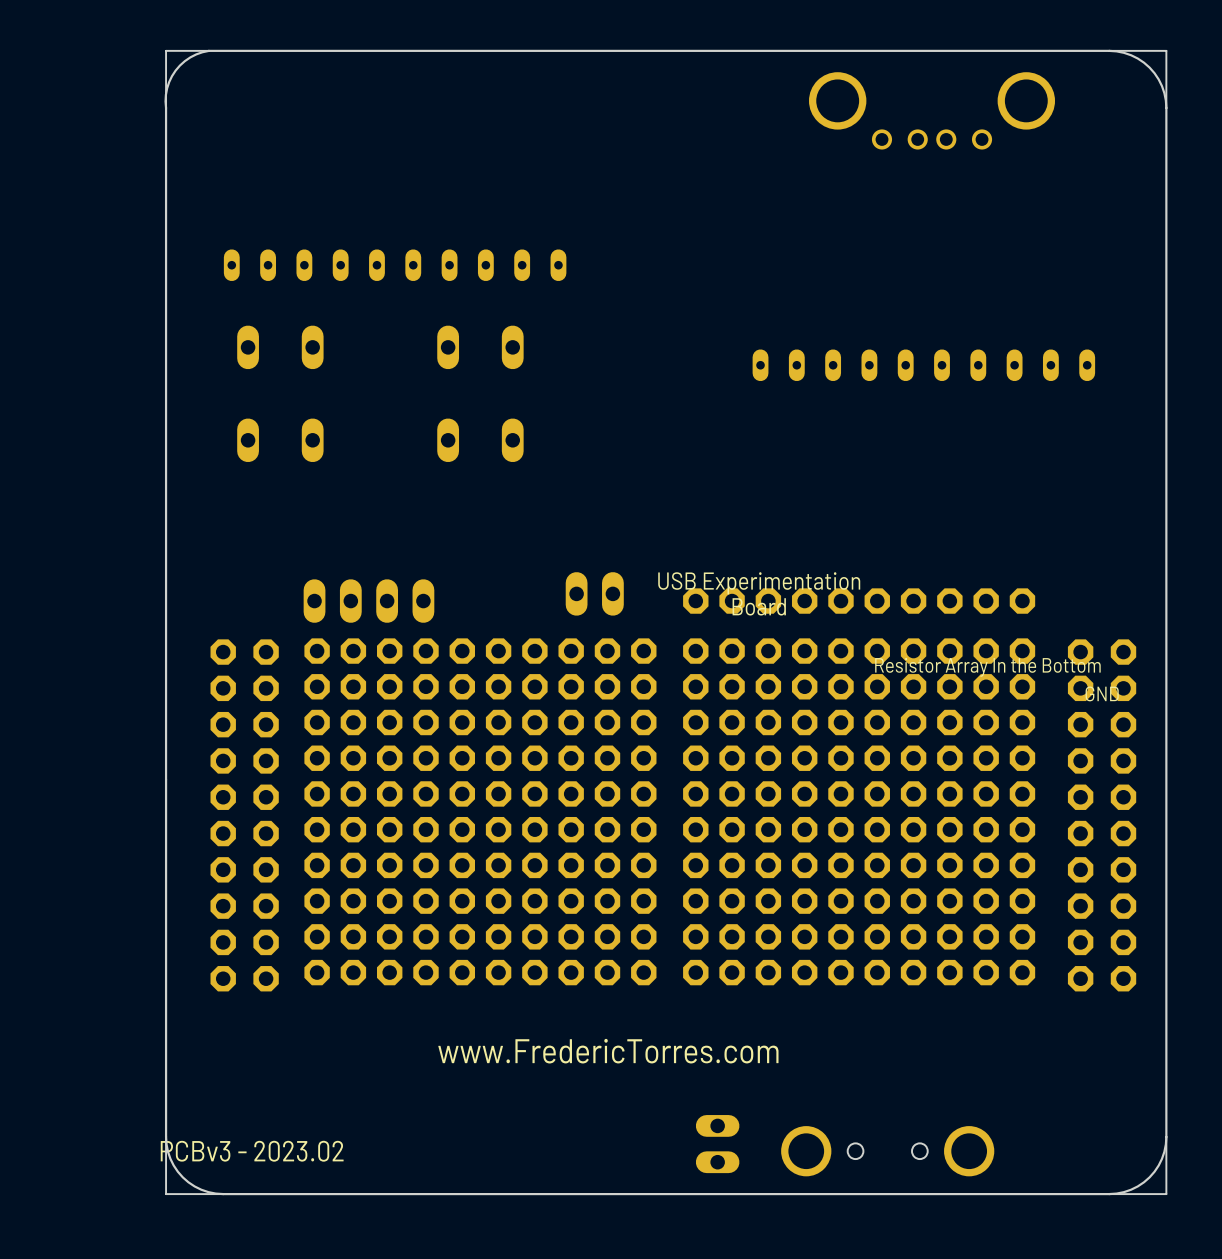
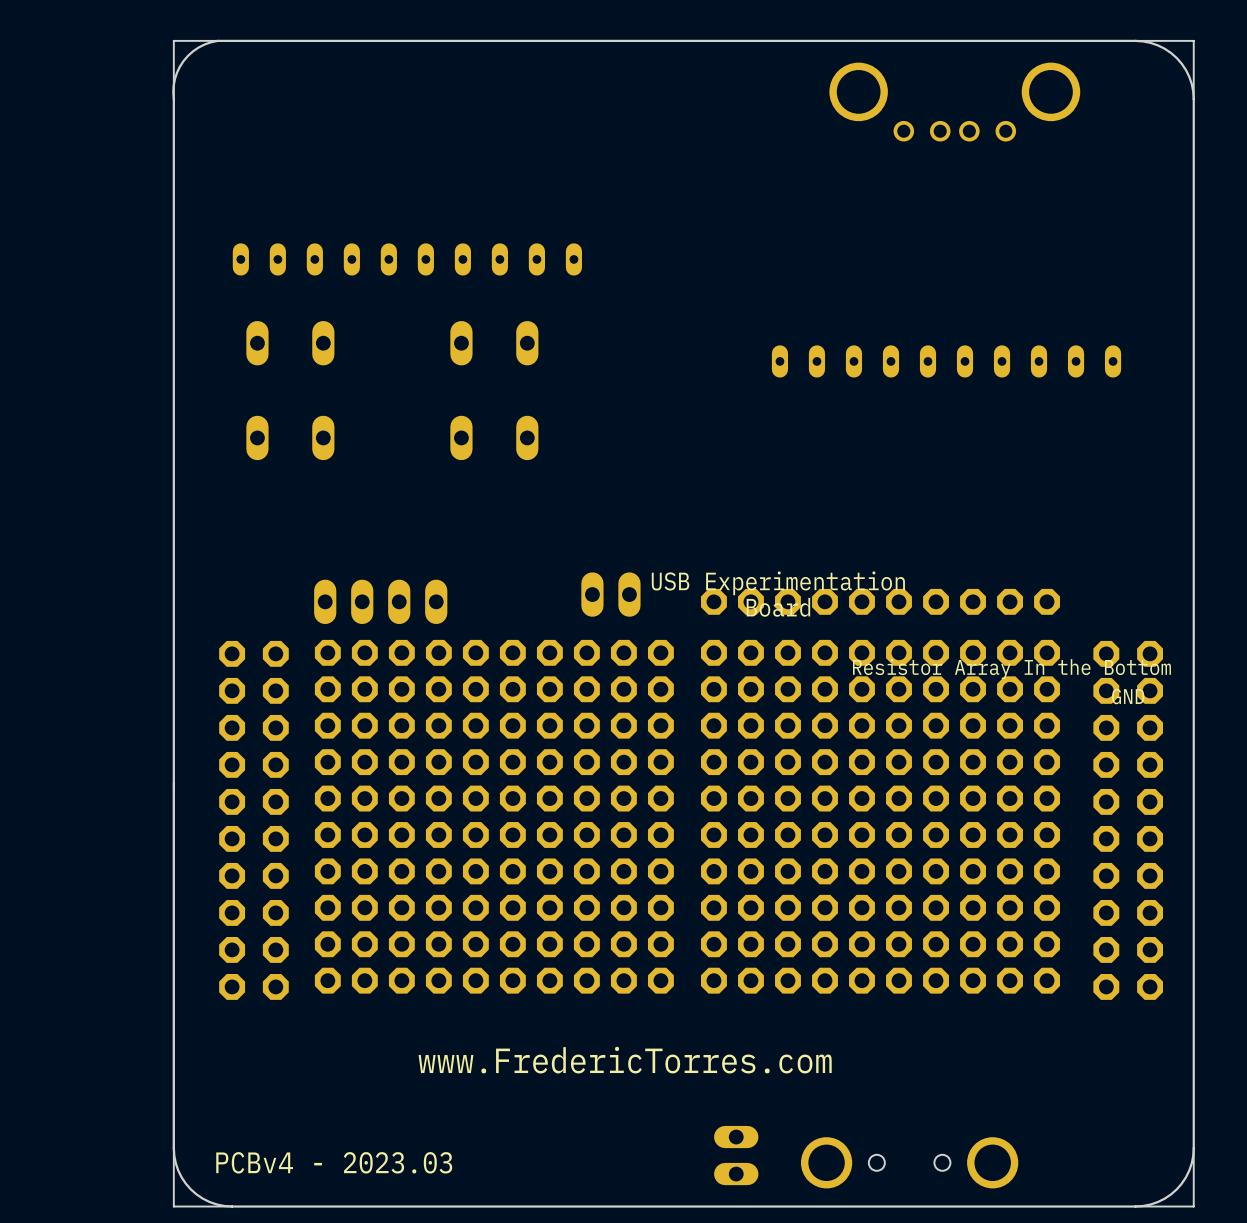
text: PCBv3 - 2023.02 (252, 1151) -> PCBv4 - 2023.03 (334, 1162)

